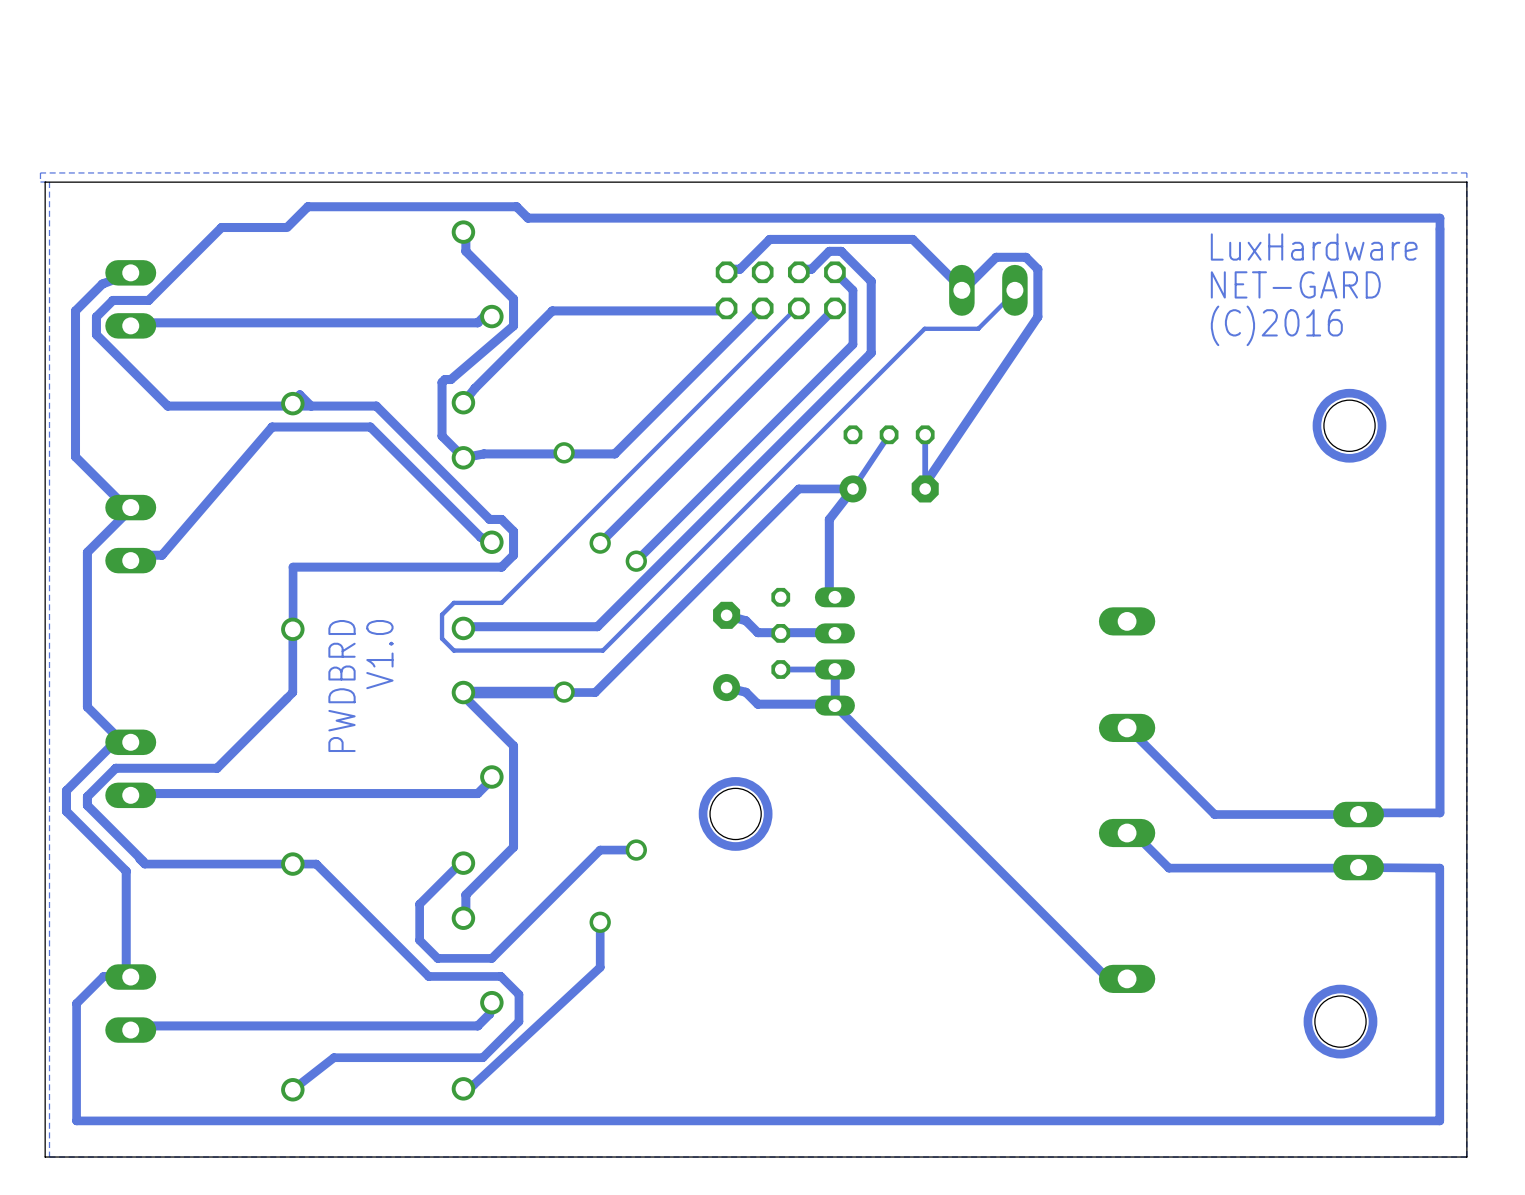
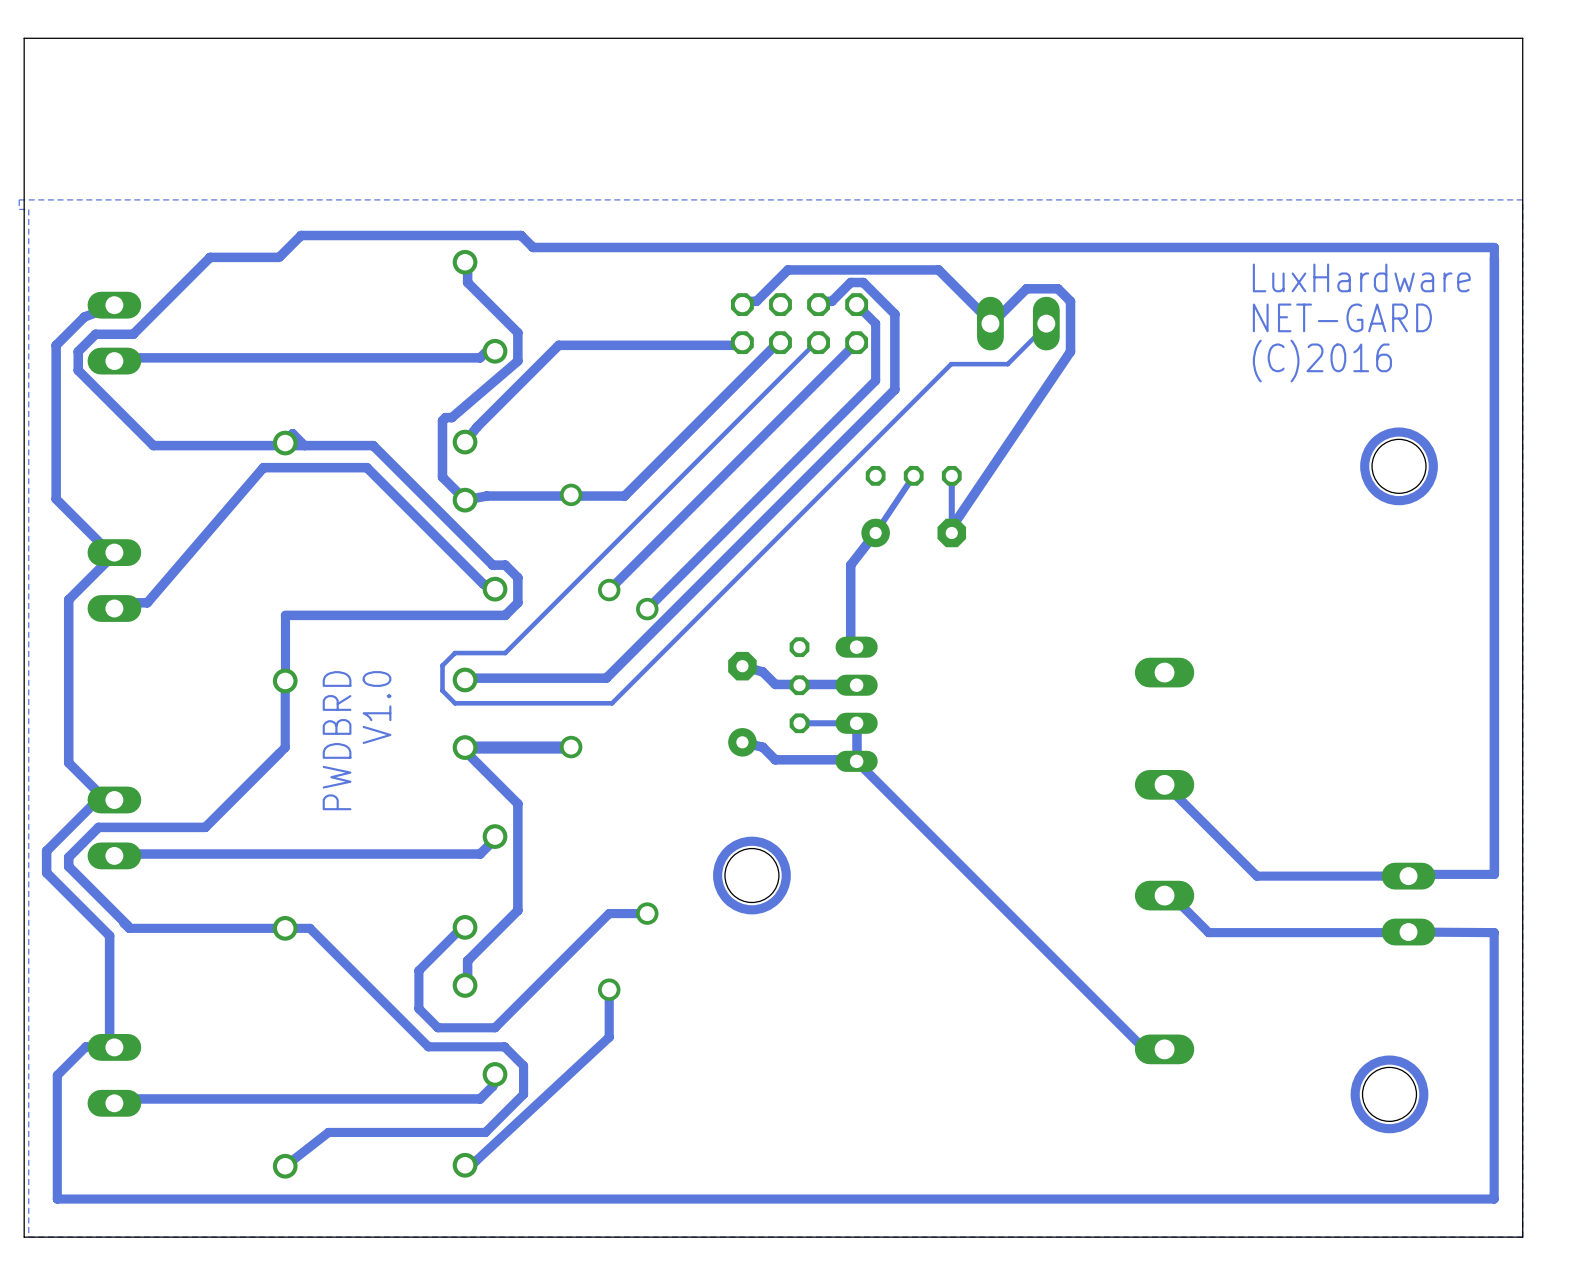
board edge: (1466, 182) (45, 182) -> (1522, 209) (1522, 38) (24, 38) (24, 209)
track: (852, 488) (798, 488) (595, 692) (564, 692) -> none

